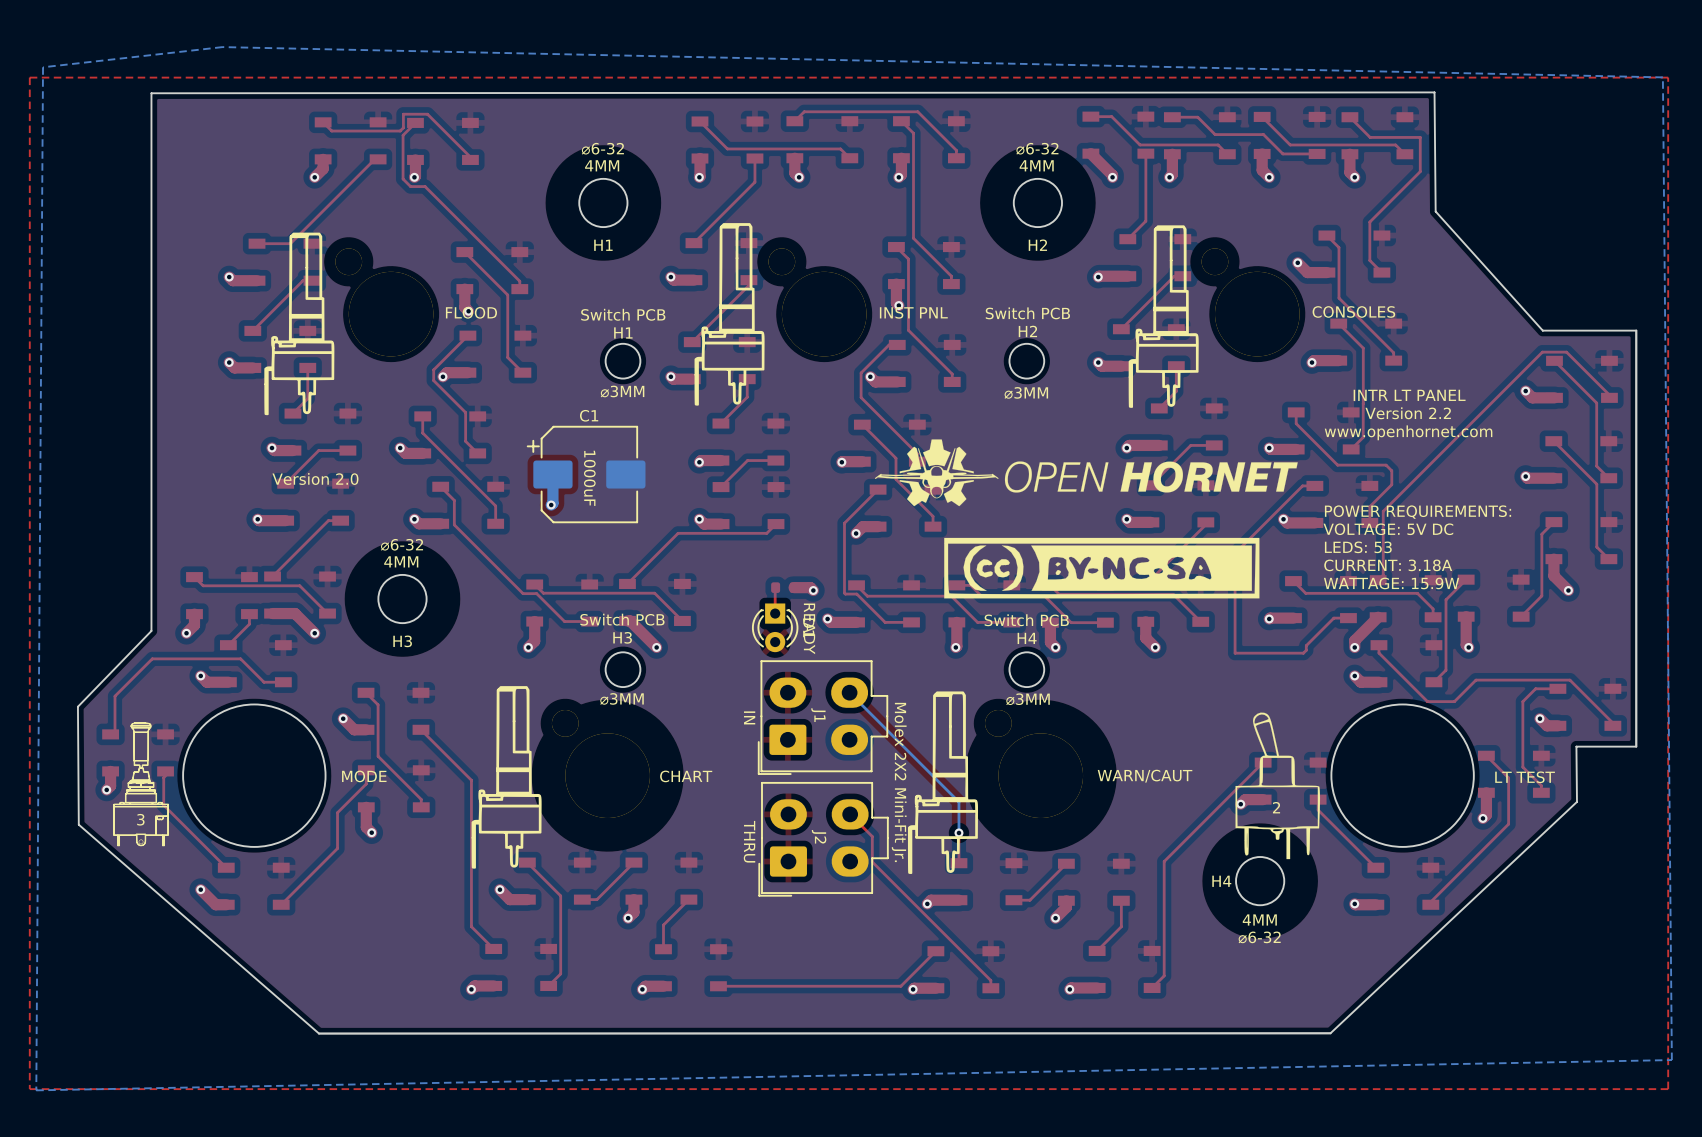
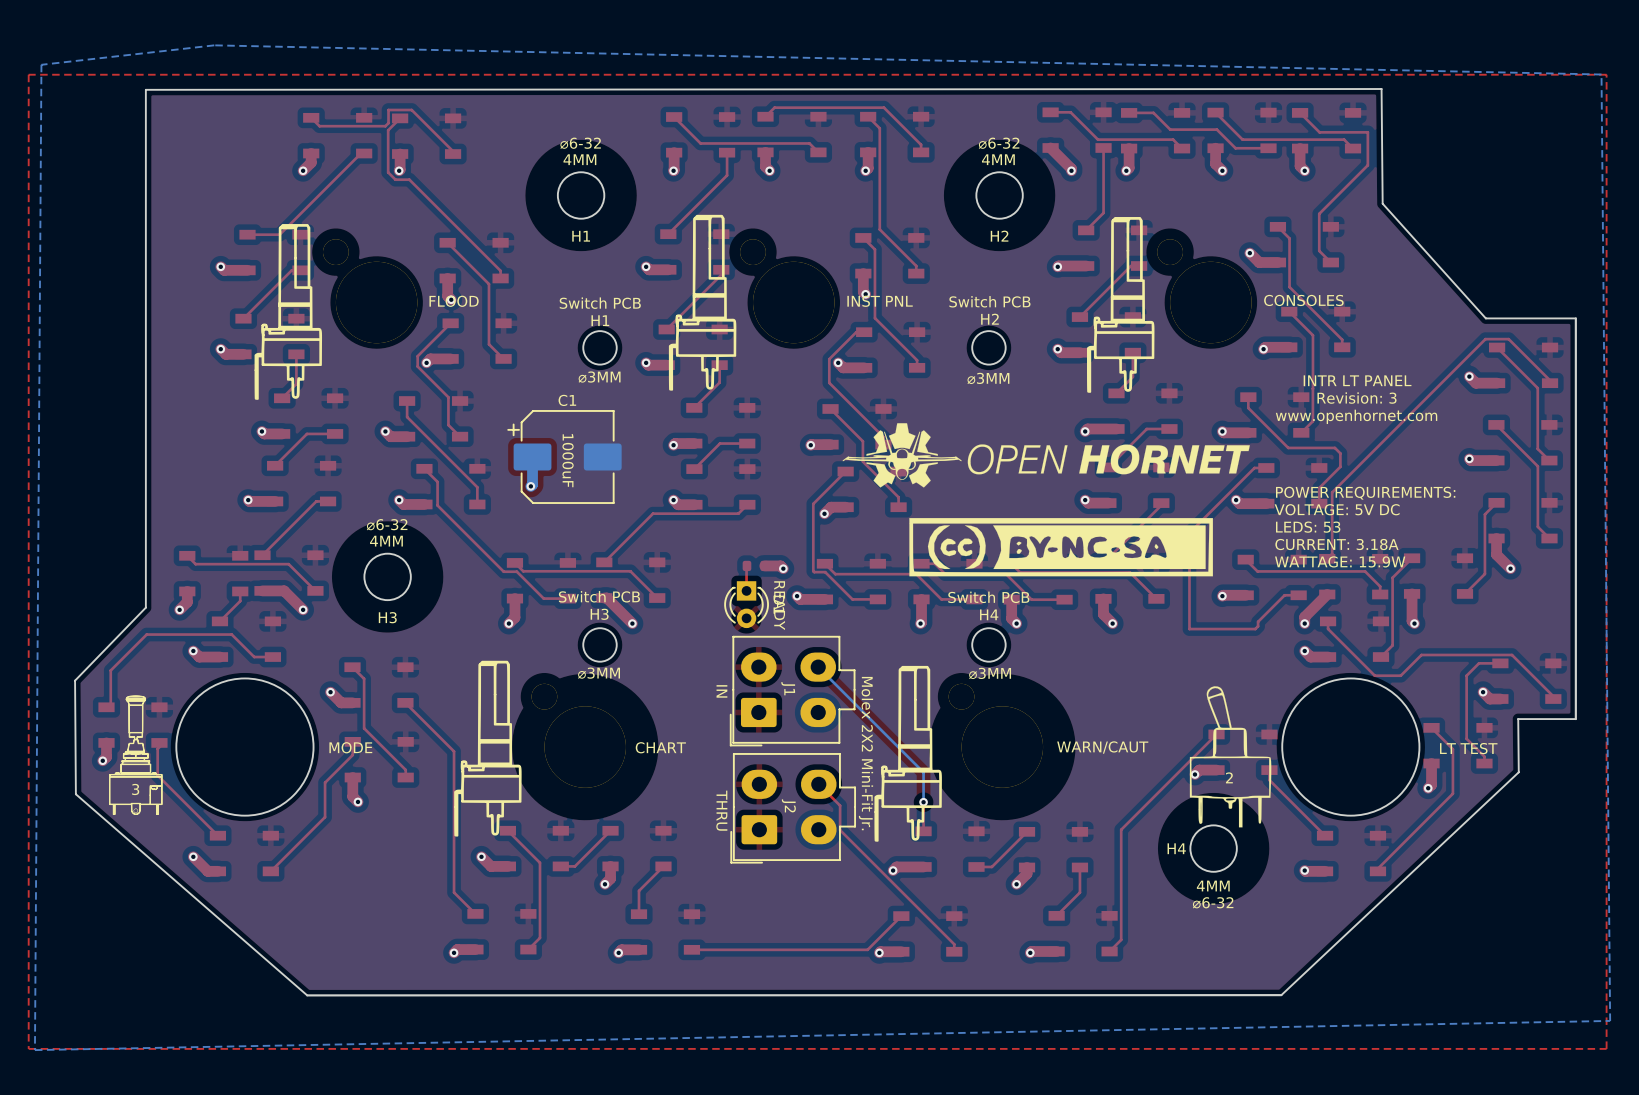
text: Version 2.2 (1408, 413) -> Revision: 3 (1357, 398)
text: Version 2.0 (315, 478) -> none

